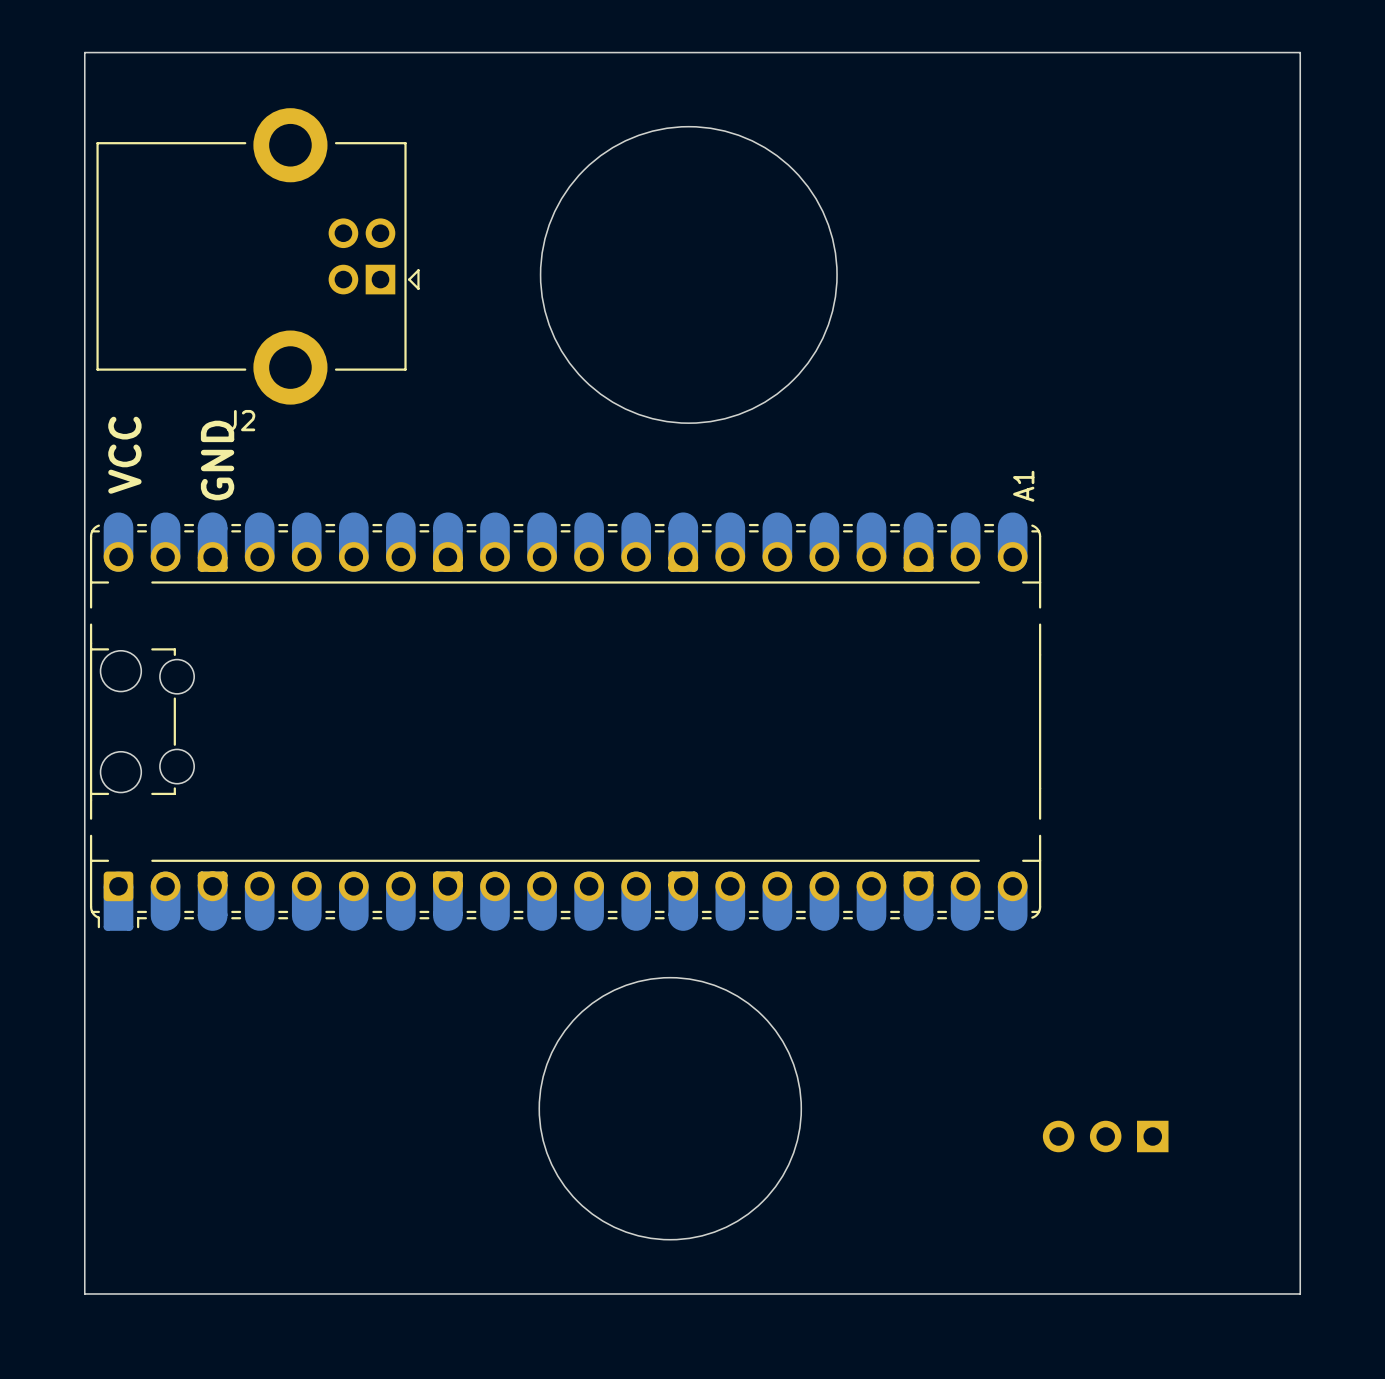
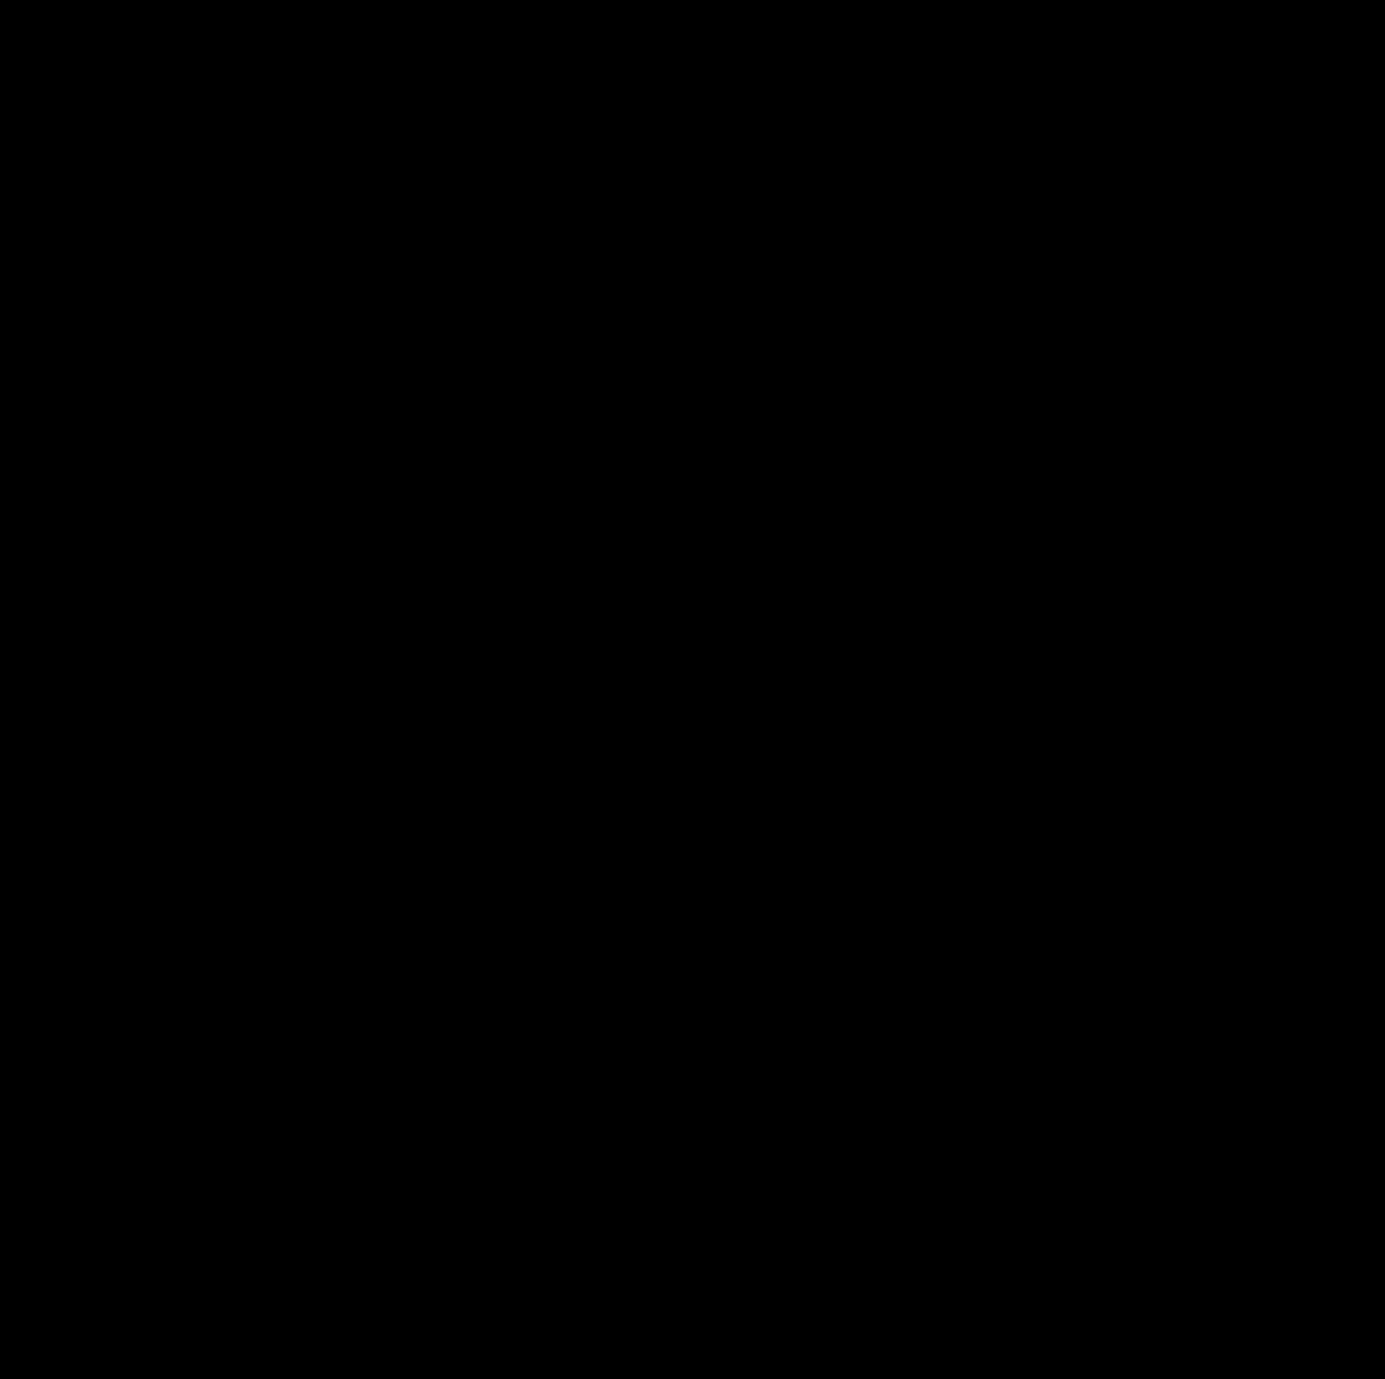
board edge: (1300, 52) (84, 52) (84, 1293) (1300, 1293) (1300, 52) -> none
round board edge: [540, 126, 838, 424] -> none
J2: (258, 256) -> none
text: VCC (124, 455) -> none
text: GND (217, 460) -> none
A1: (565, 721) -> none
round board edge: [538, 977, 802, 1241] -> none
part: (1105, 1136) -> none

